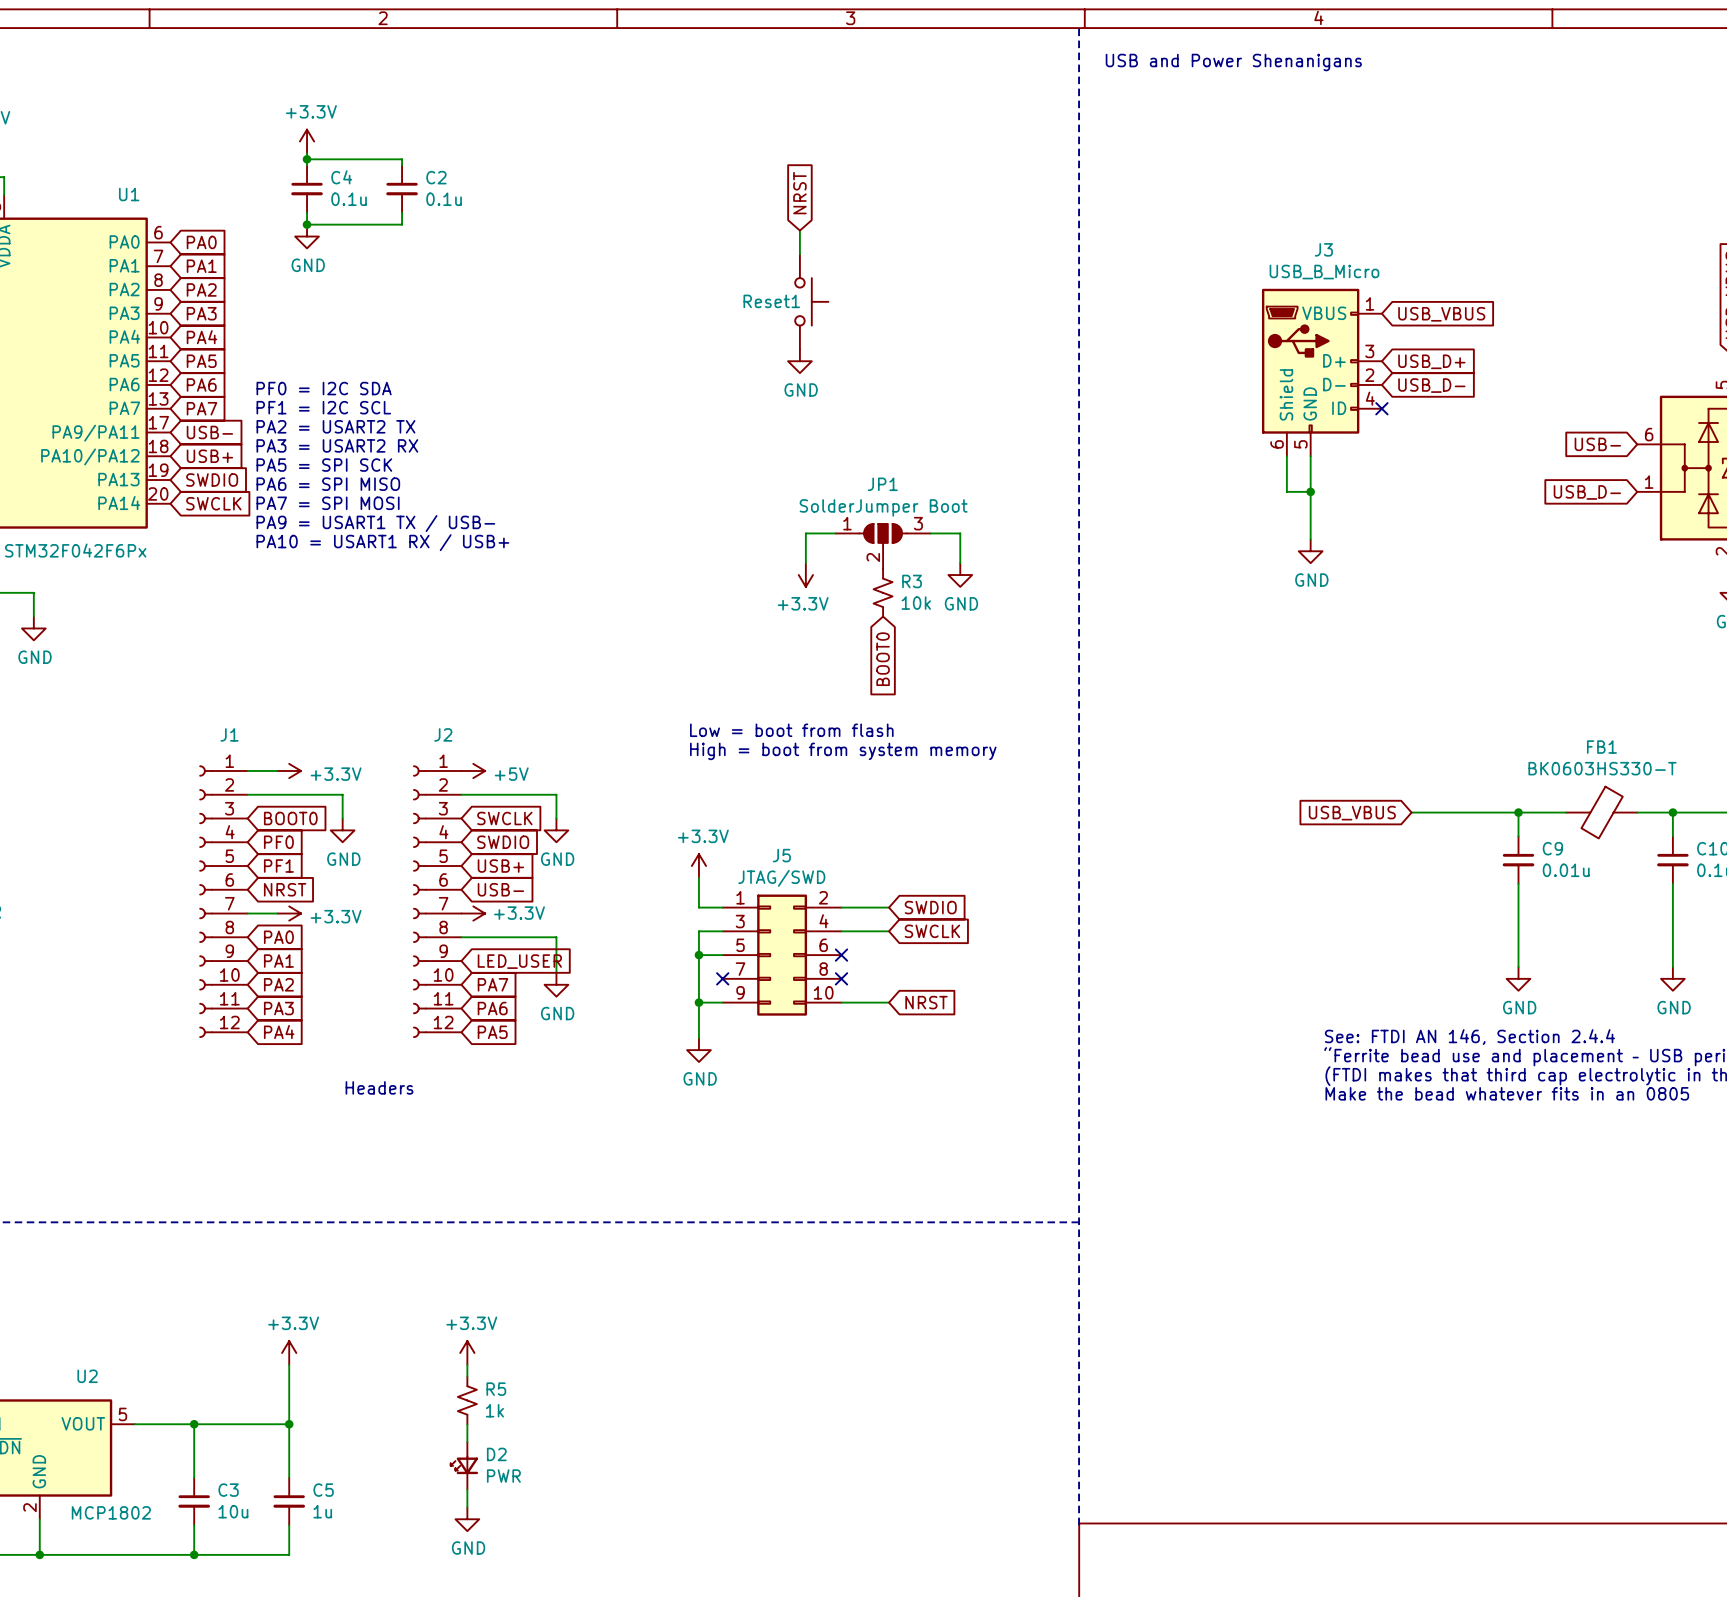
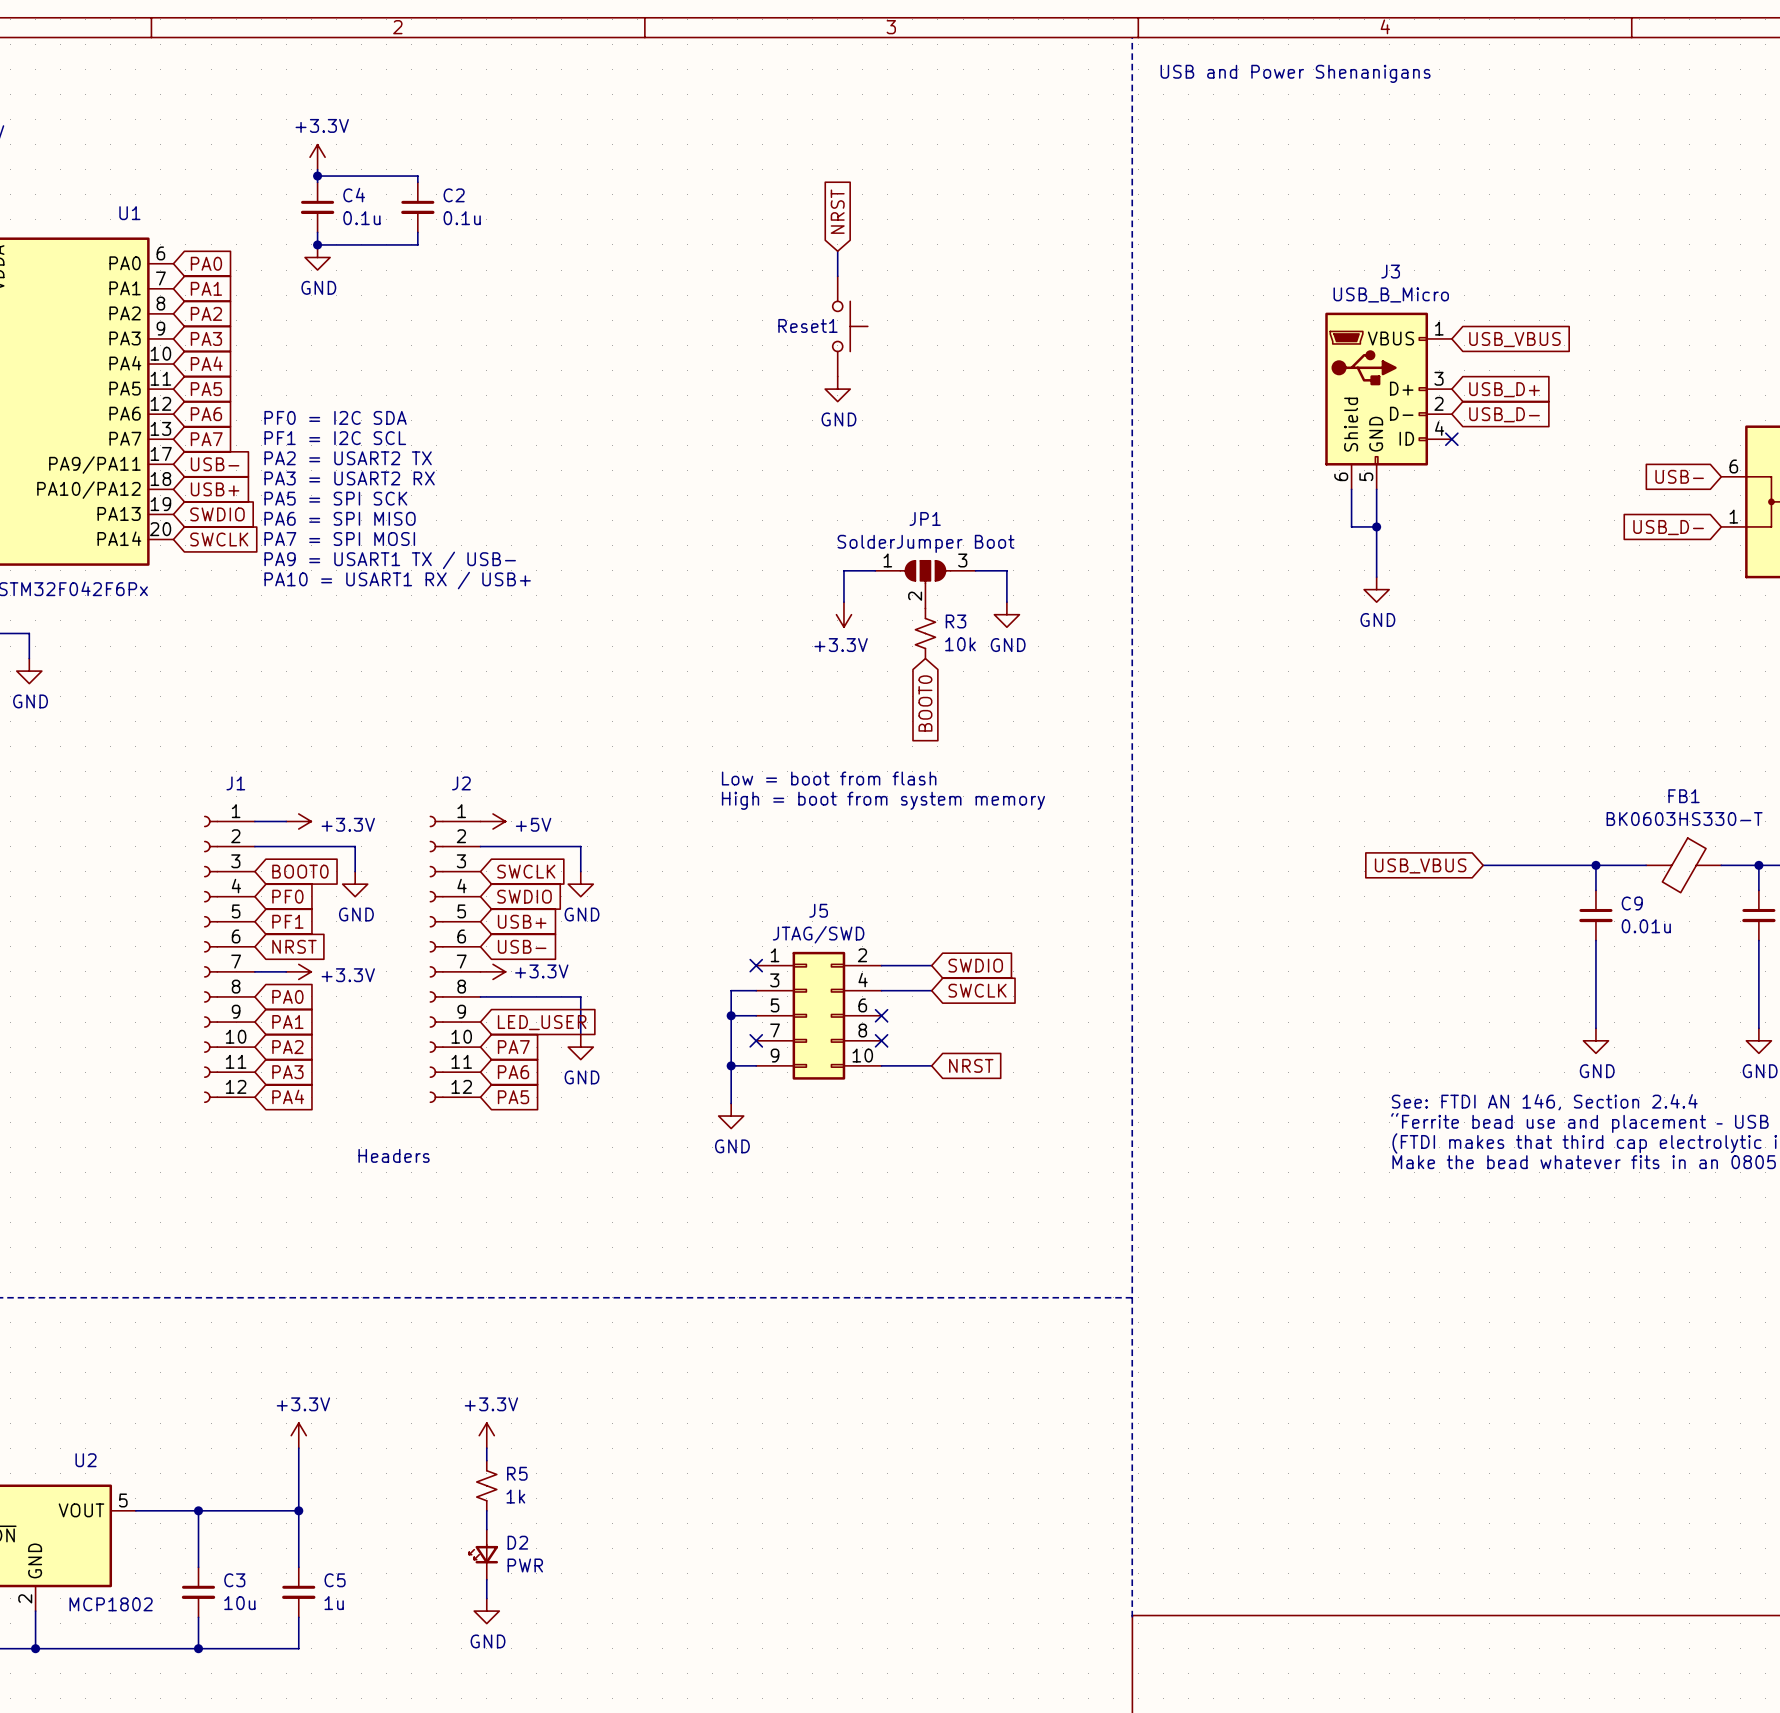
power symbol: +3.3V (698, 866) -> none
wire: (698, 877) (698, 907) (722, 907) -> none
no-connect mark: none -> (756, 965)

